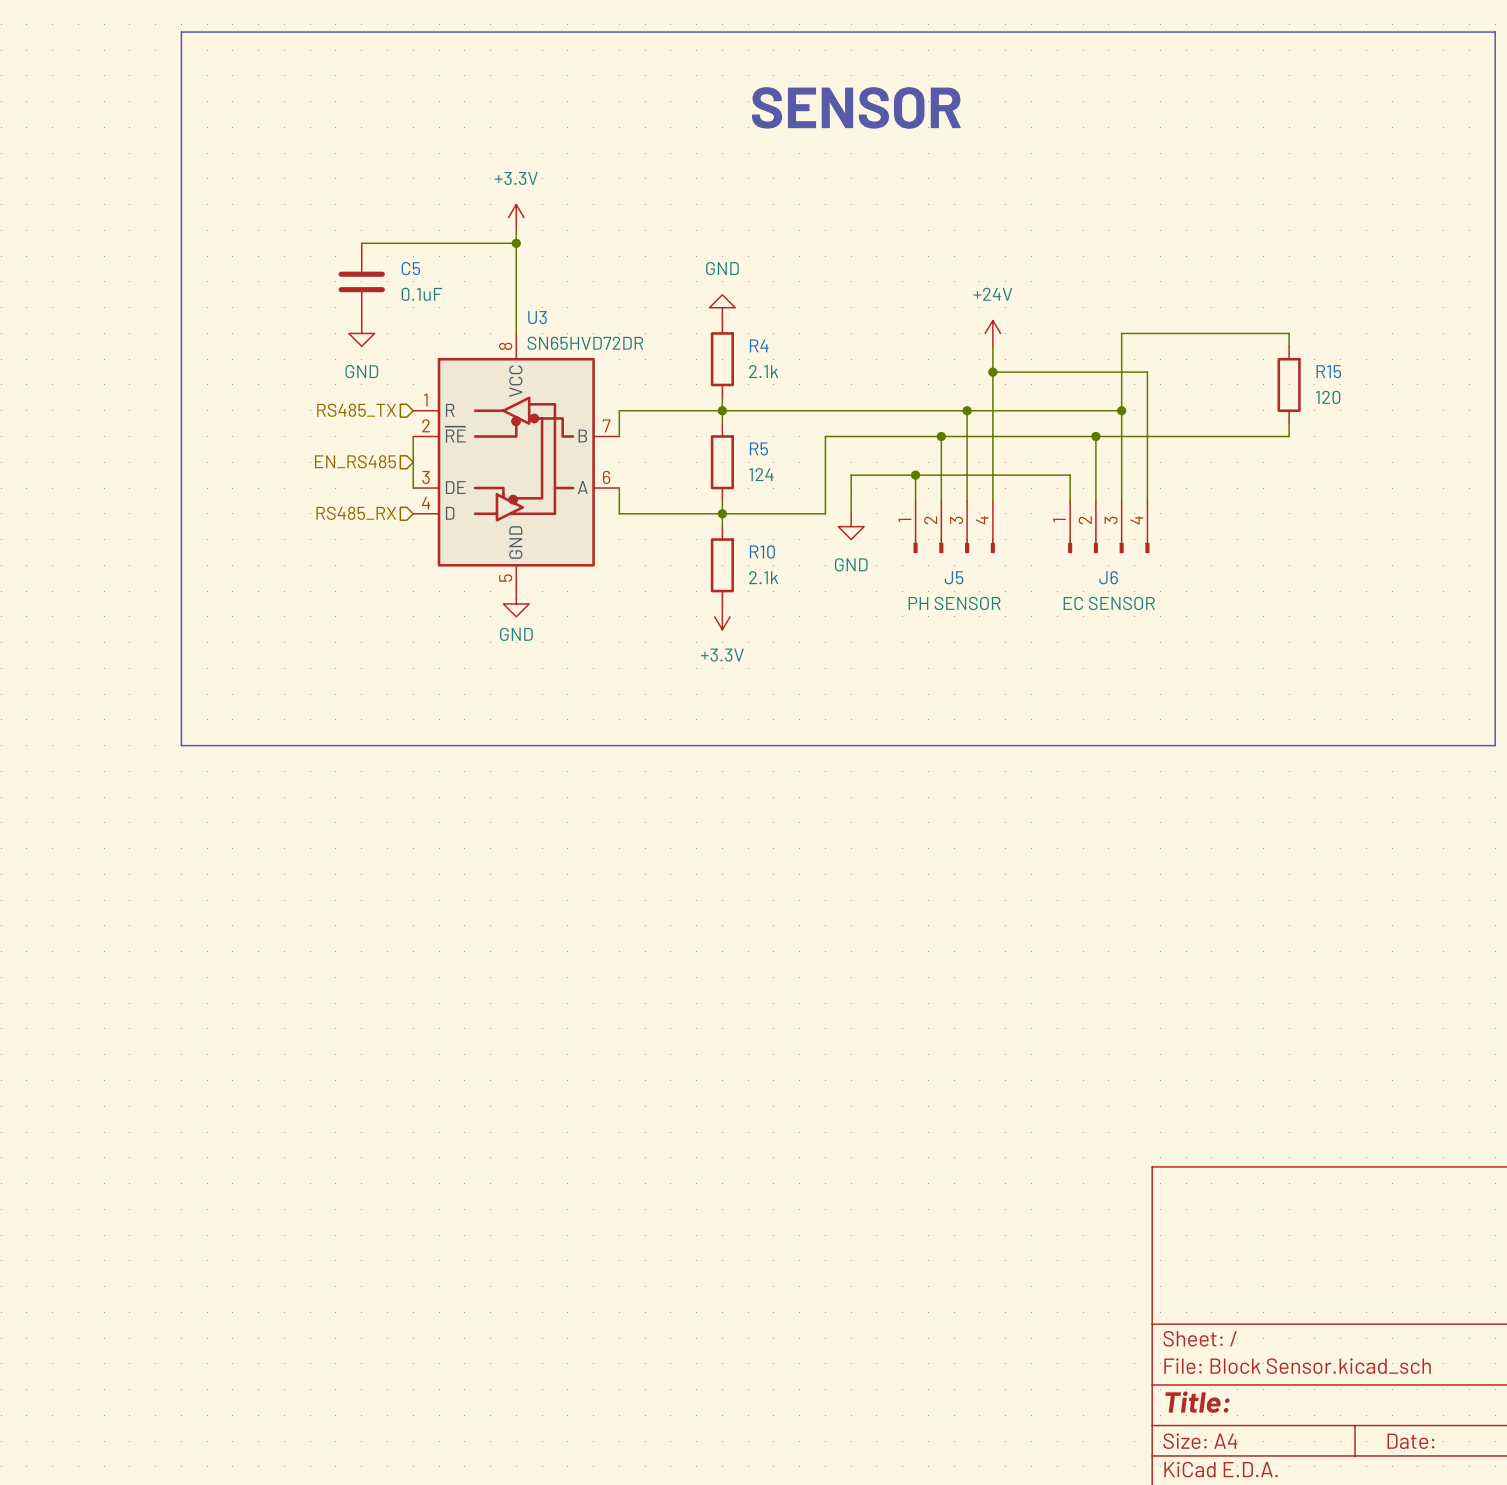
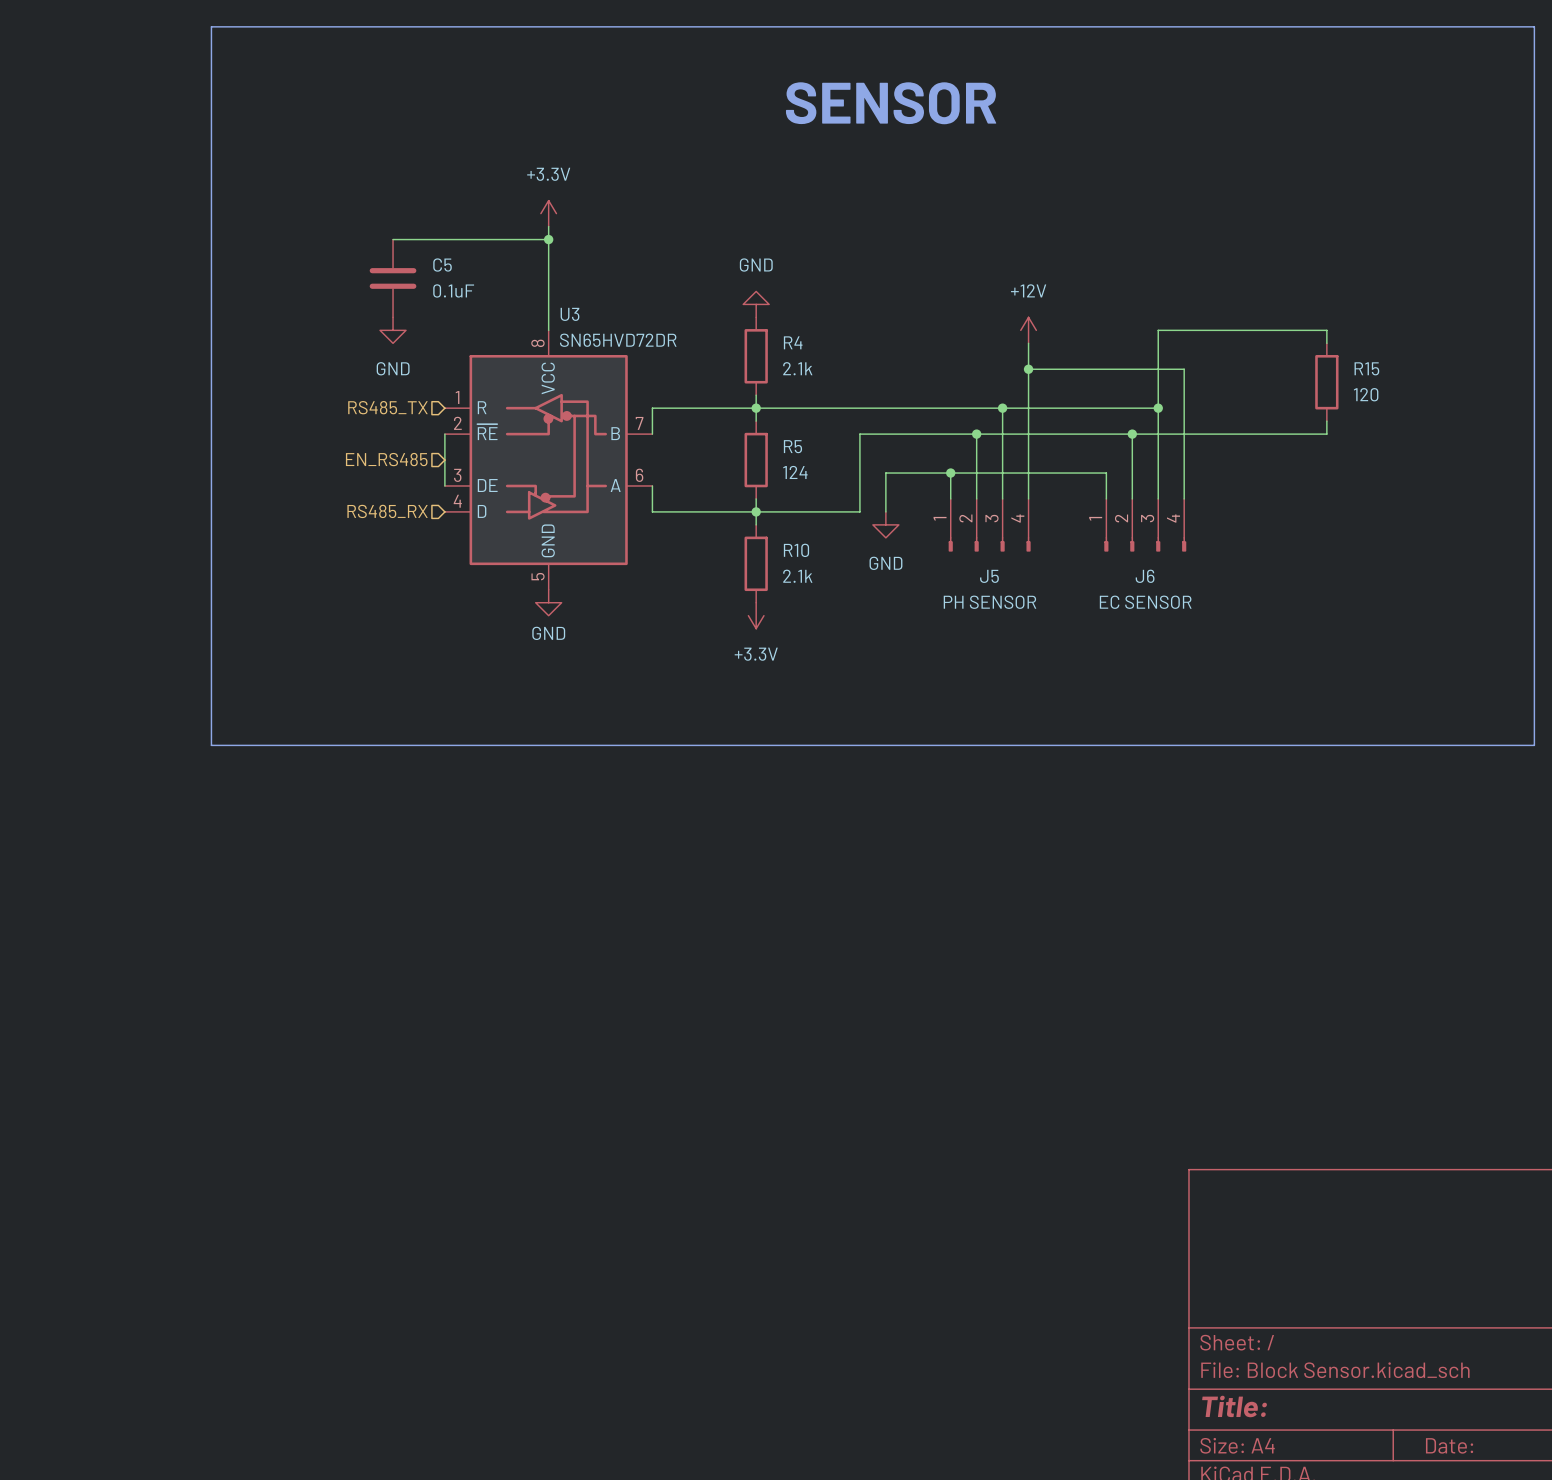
power symbol: +24V (992, 333) -> +12V (1028, 330)

